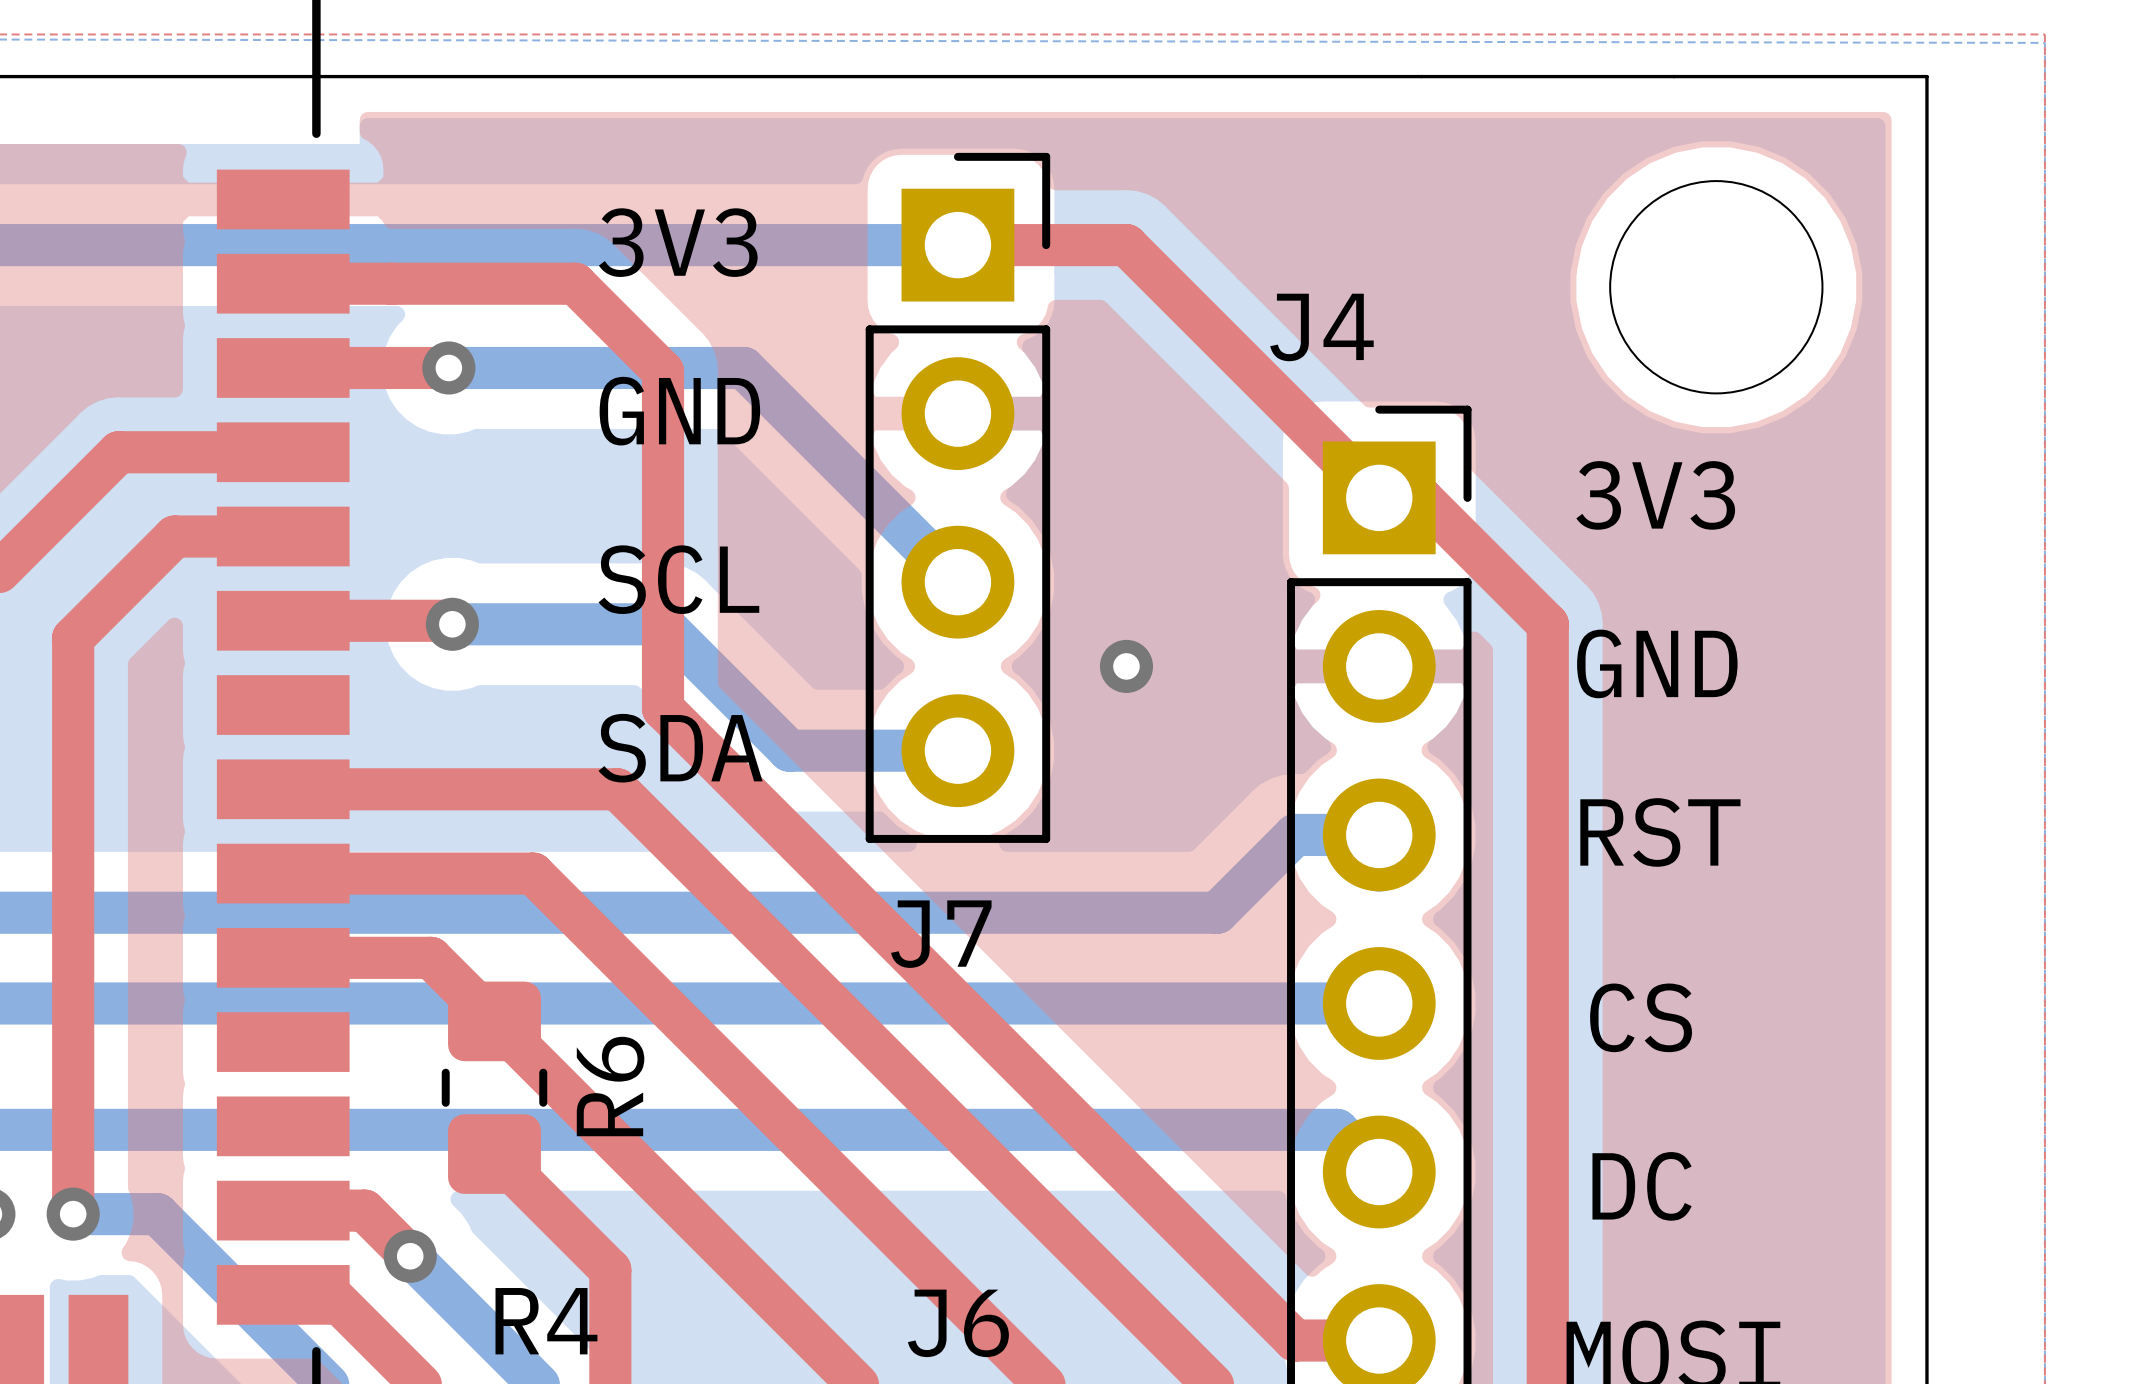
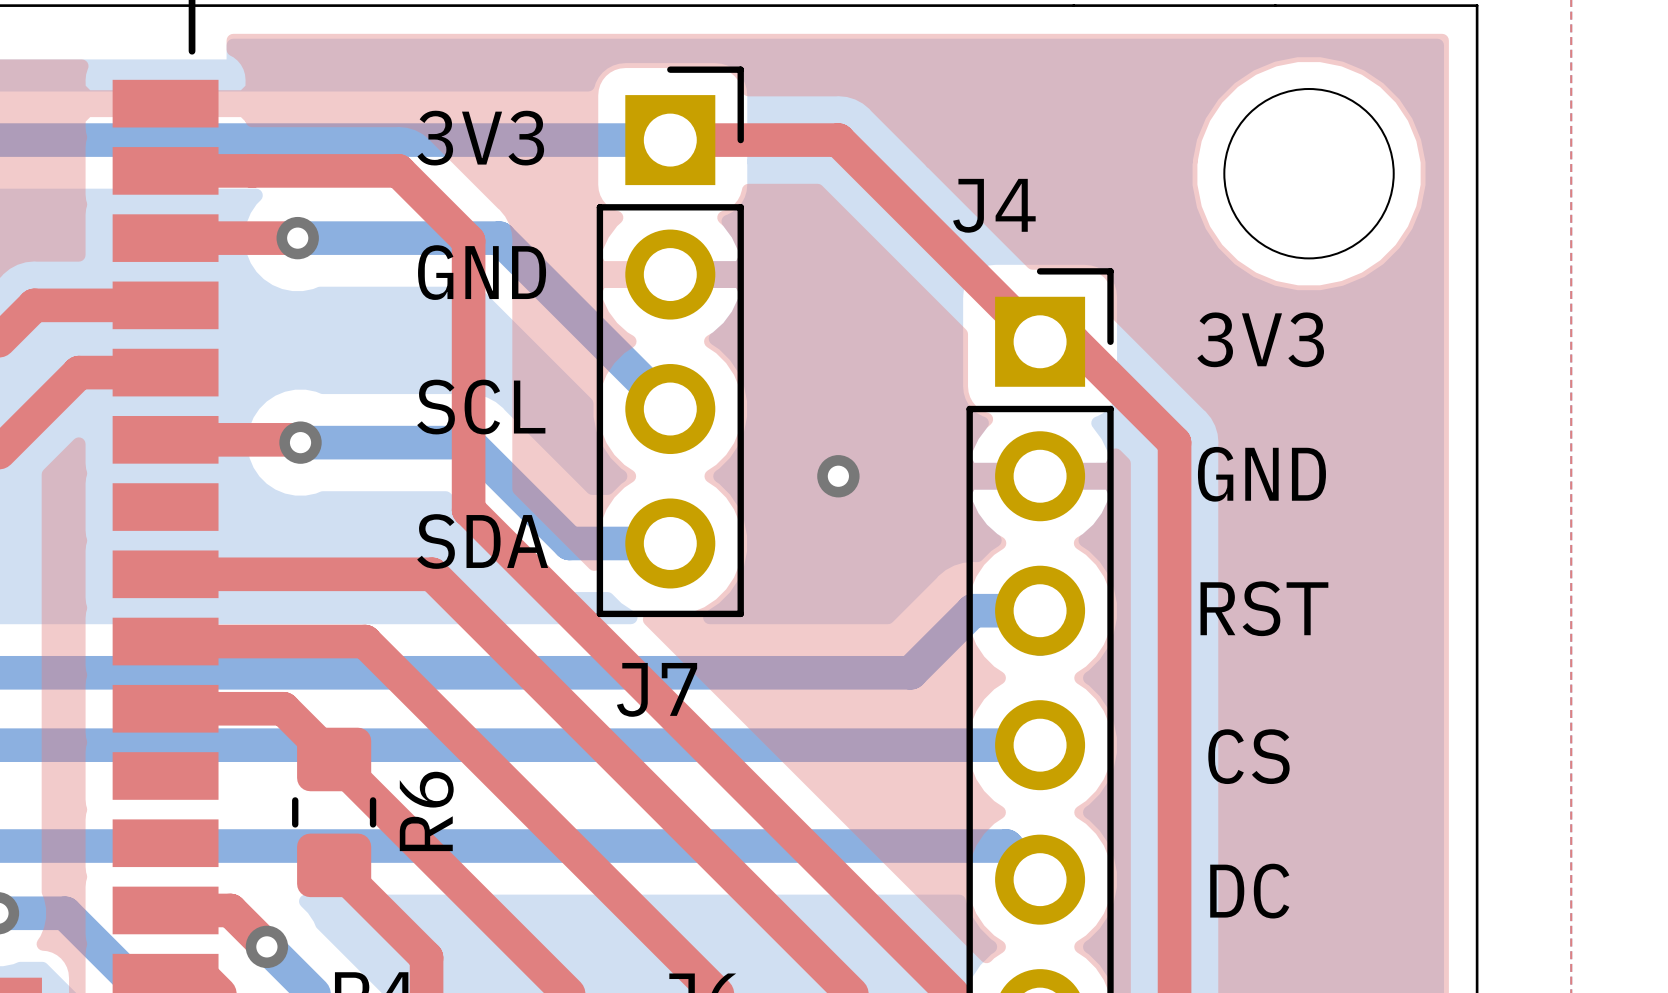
bottom track: (701, 367) (743, 367) (957, 582) -> (499, 238) (670, 409)
J7 position: (957, 497) -> (670, 341)

